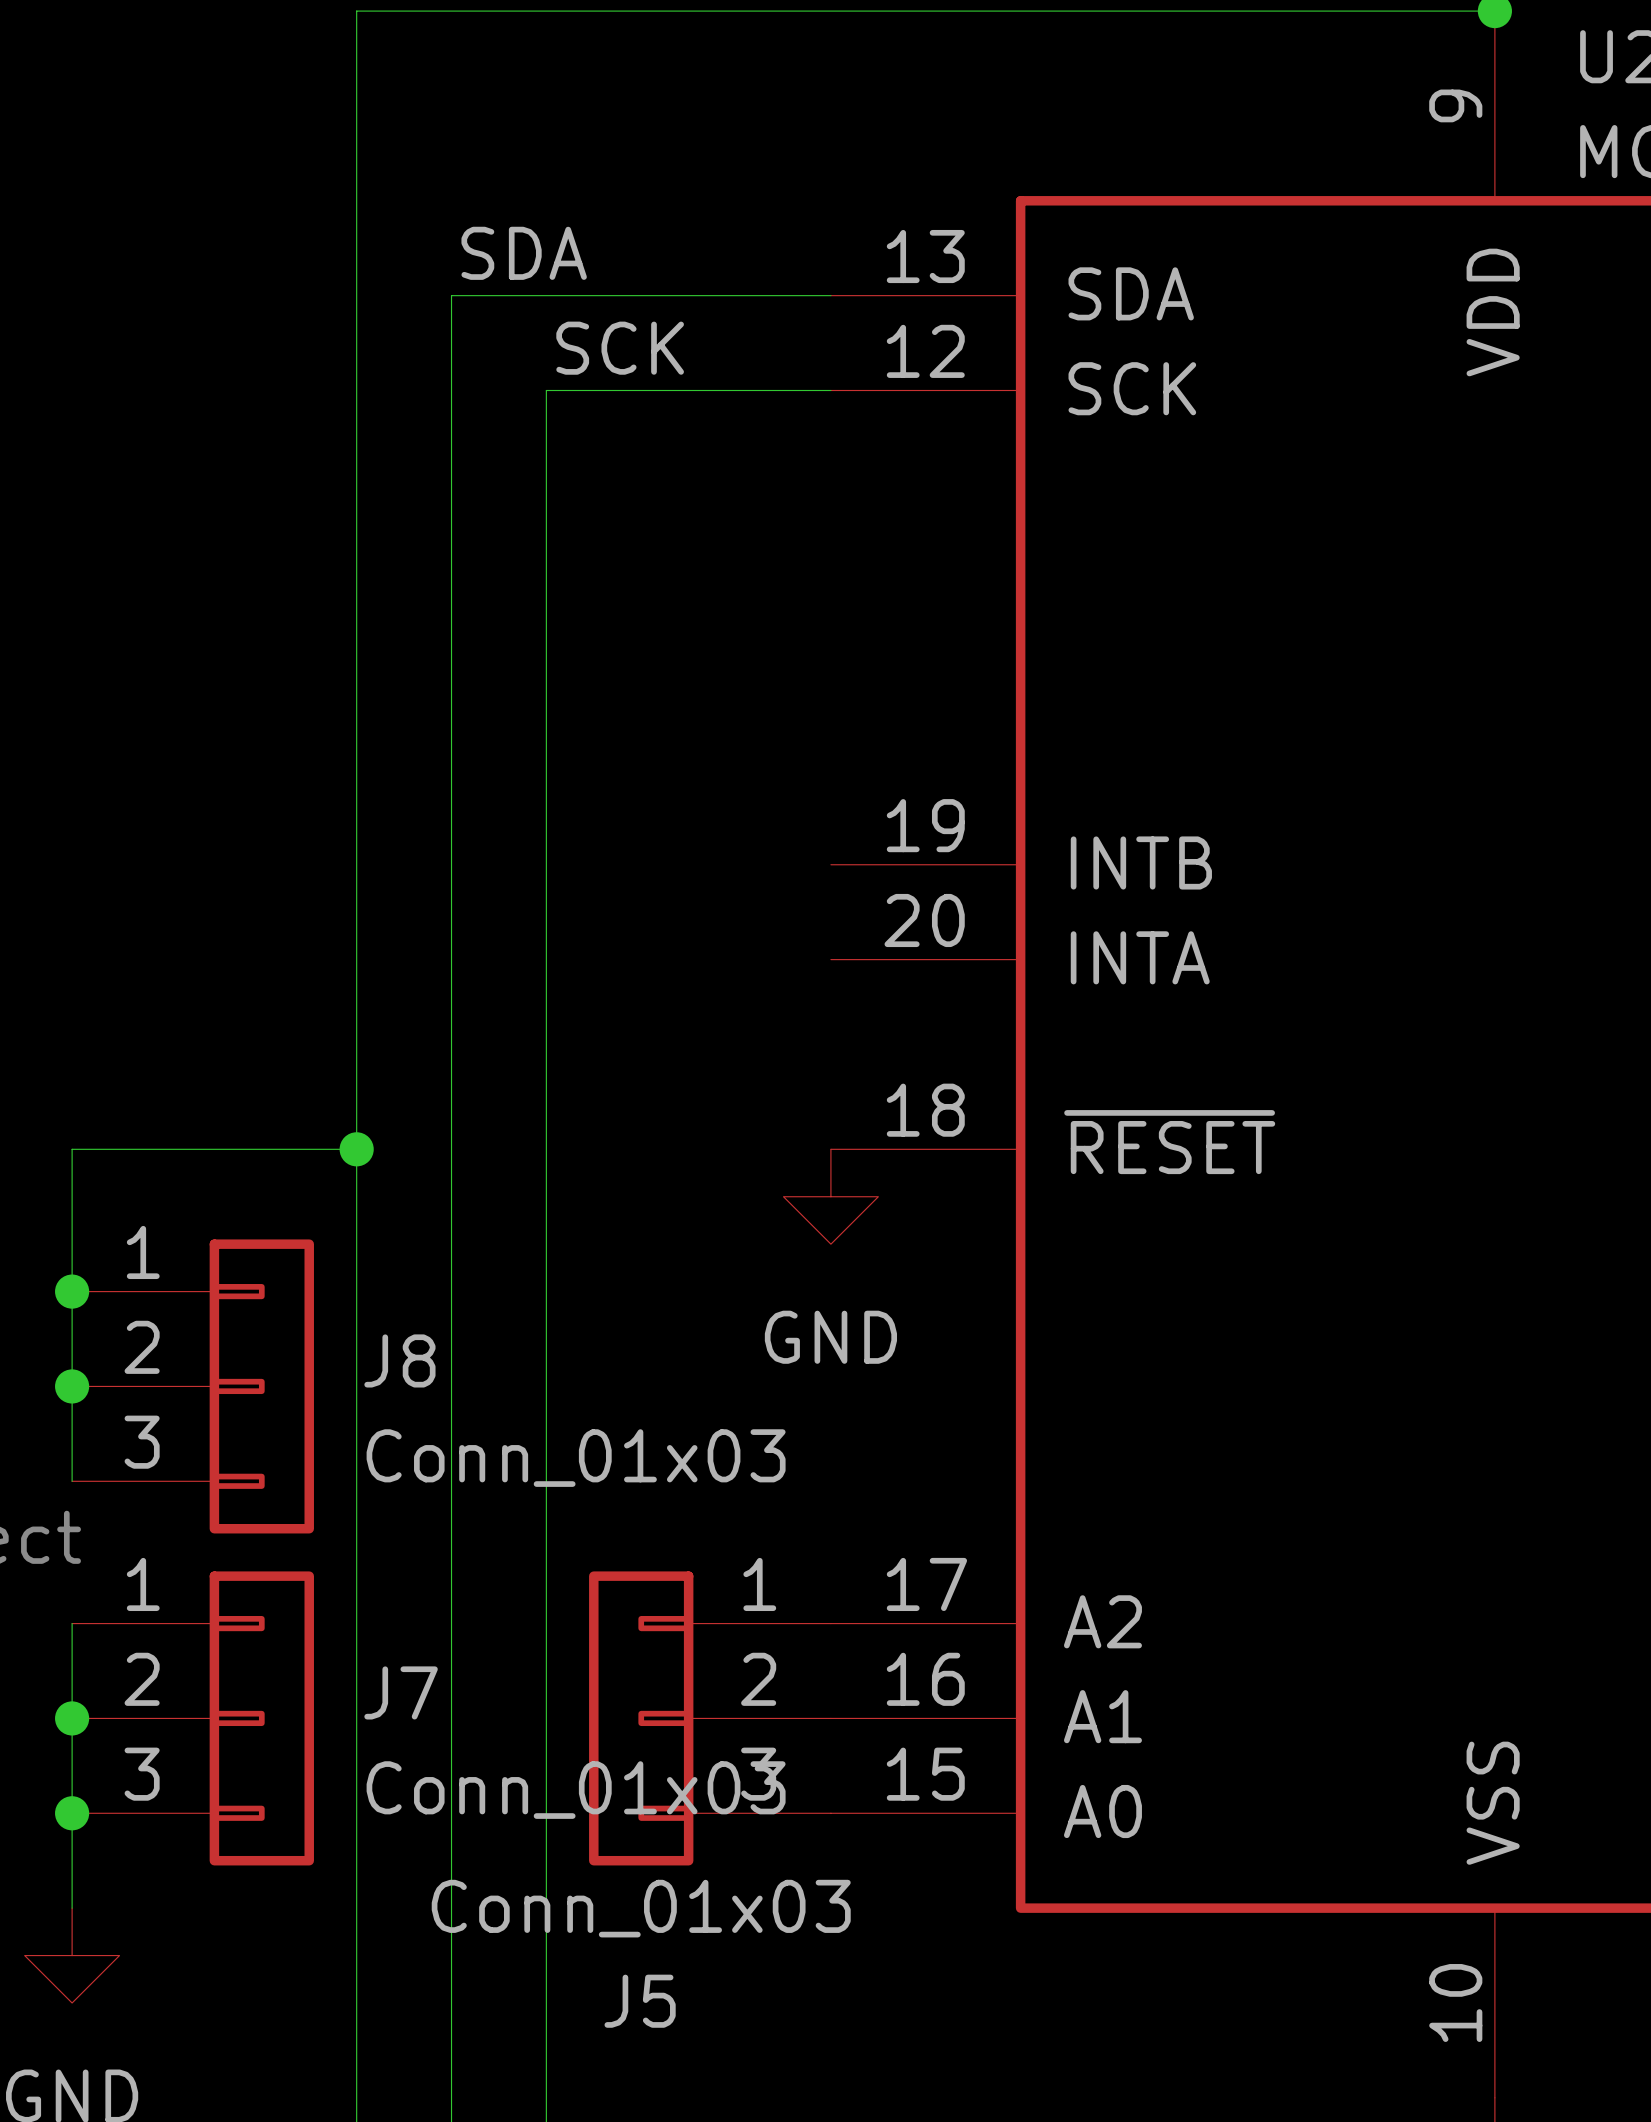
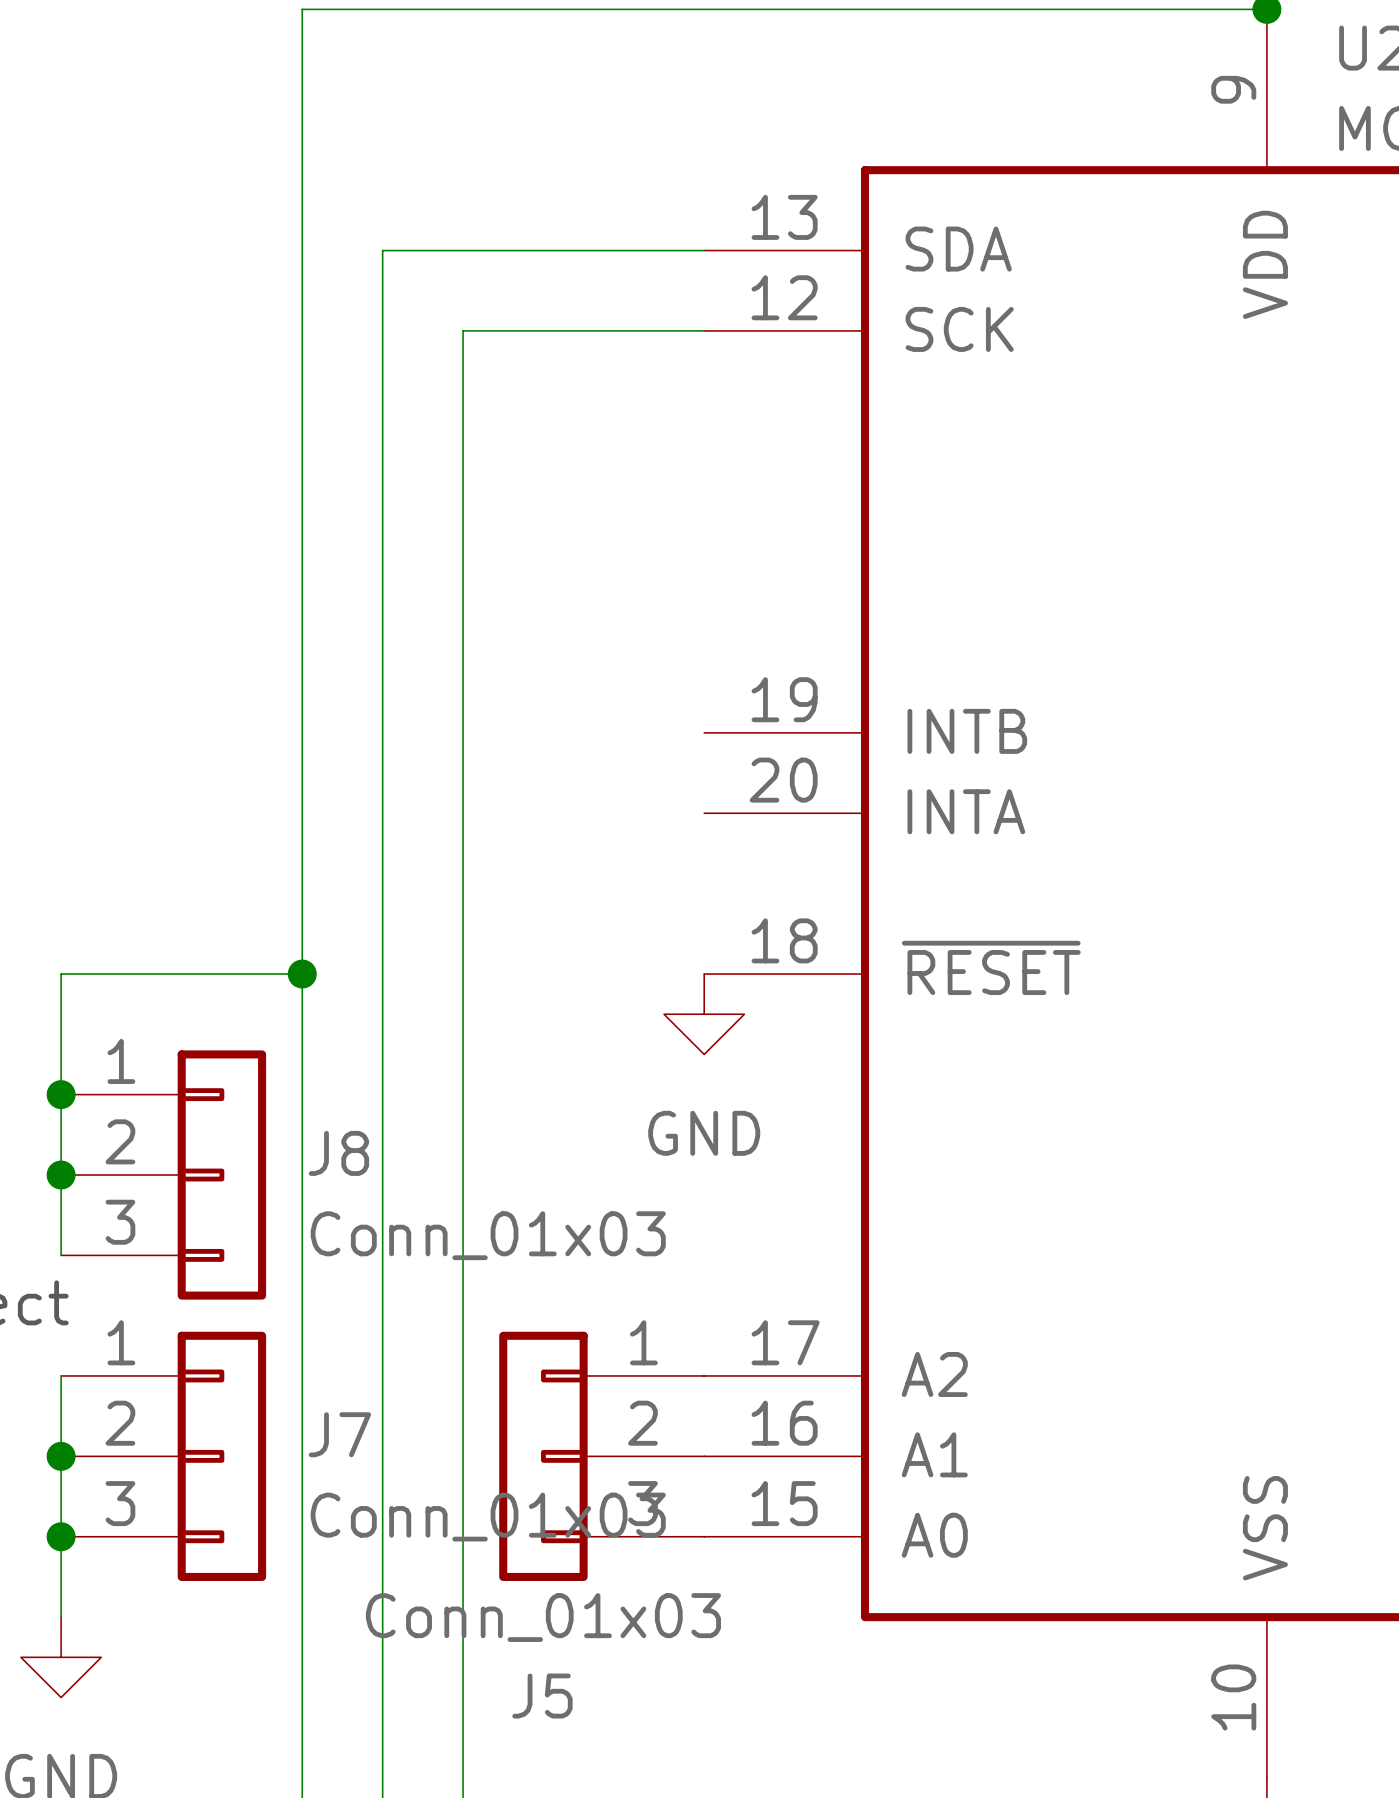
label: SDA (524, 253) -> none
label: SCK (620, 348) -> none

